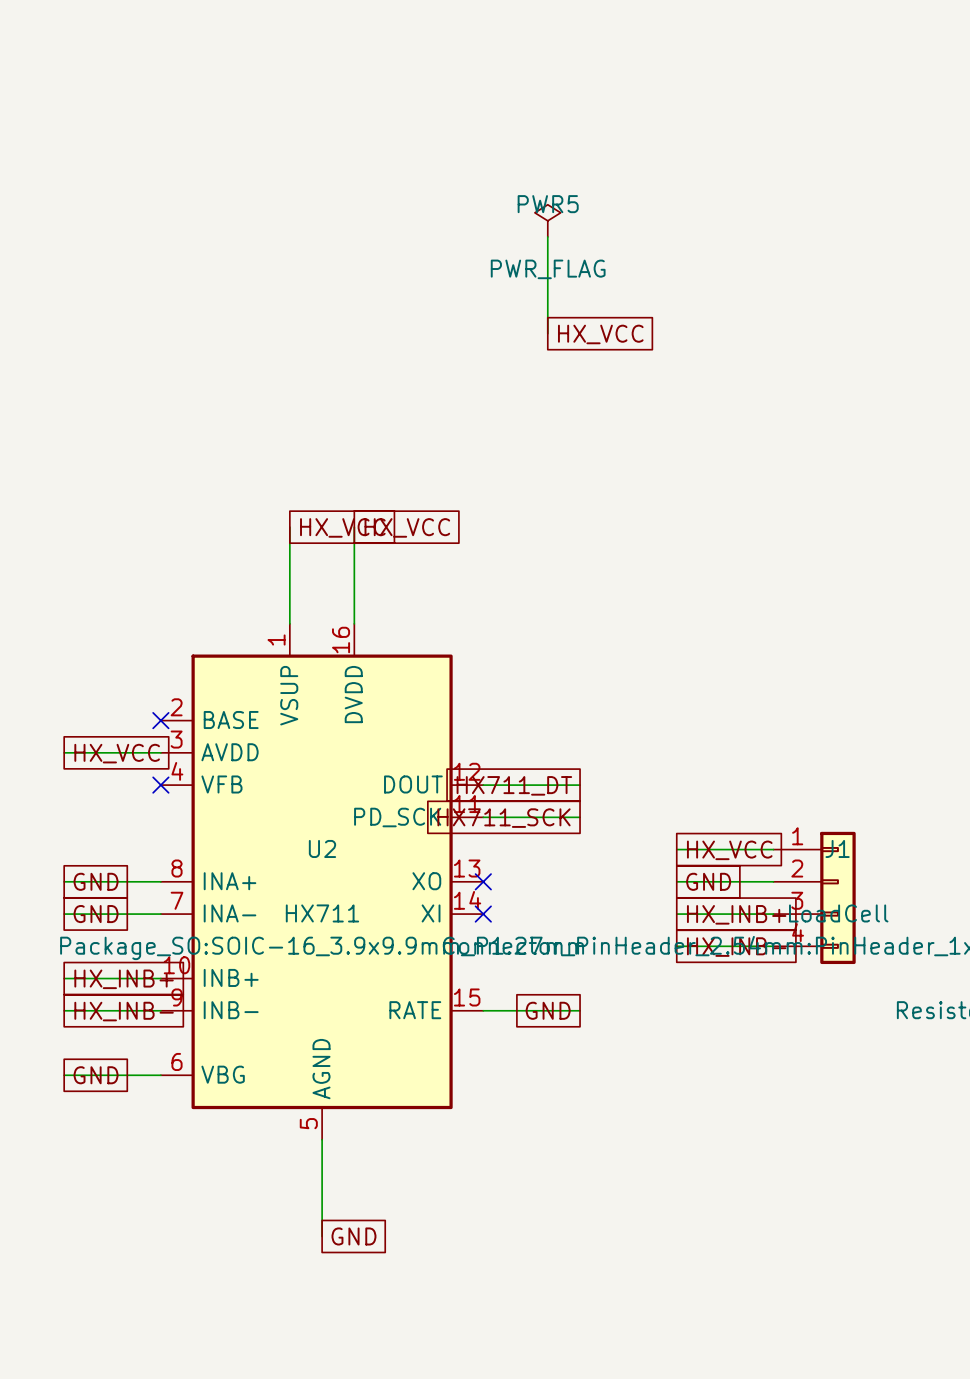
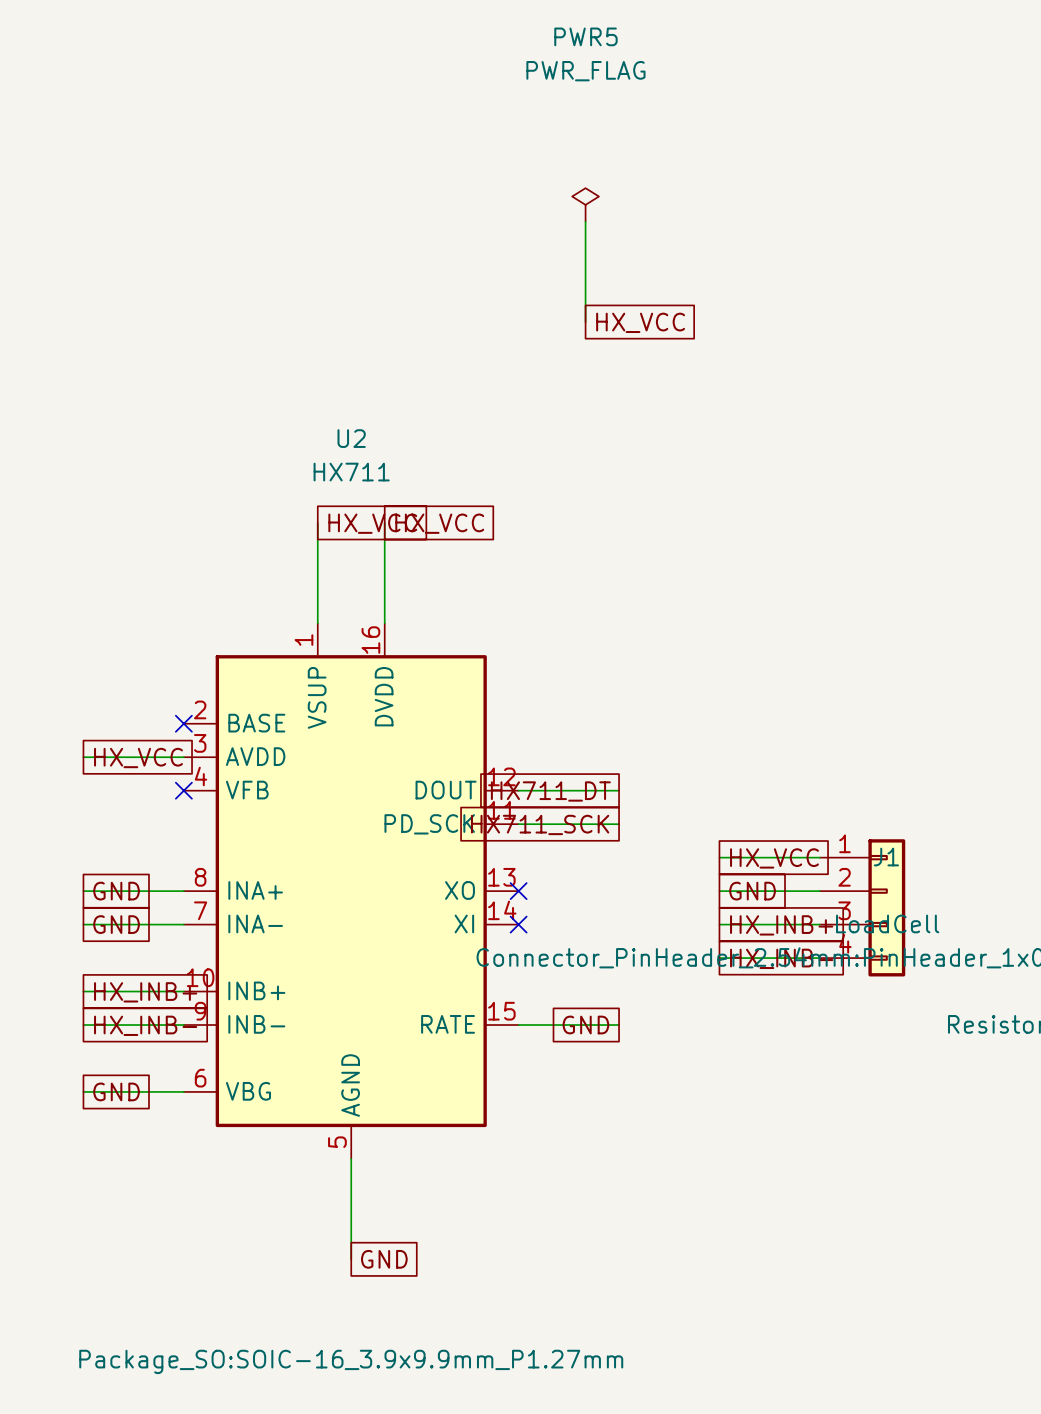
PWR5 name position: PWR5 (548, 204) -> PWR5 (585, 36)
PWR5 text position: PWR_FLAG (548, 269) -> PWR_FLAG (585, 71)
U2 name position: U2 (322, 848) -> U2 (351, 438)
U2 value position: HX711 (322, 913) -> HX711 (351, 472)
U2 text position: Package_SO:SOIC-16_3.9x9.9mm_P1.27mm (322, 948) -> Package_SO:SOIC-16_3.9x9.9mm_P1.27mm (351, 1361)

